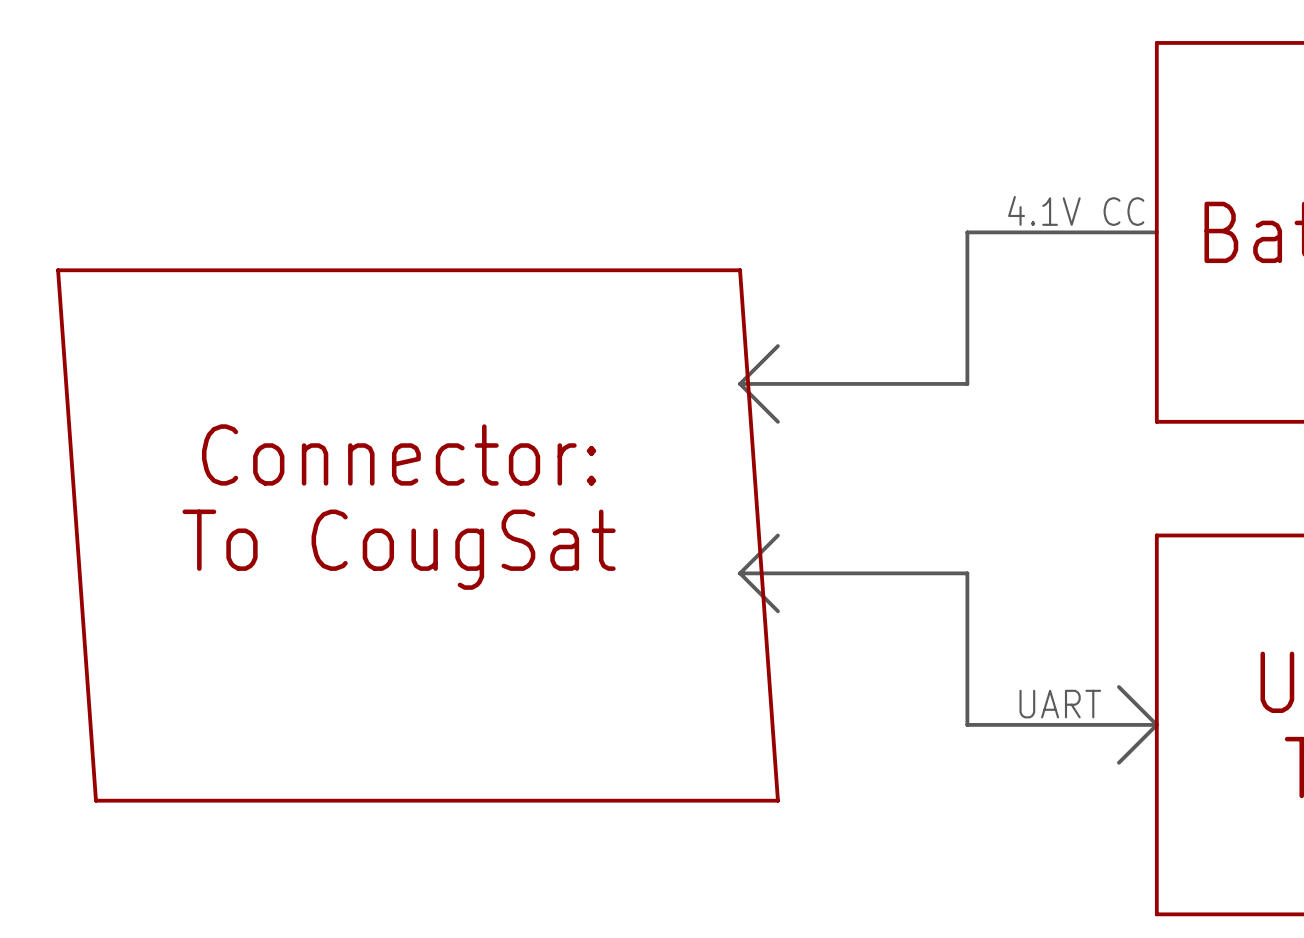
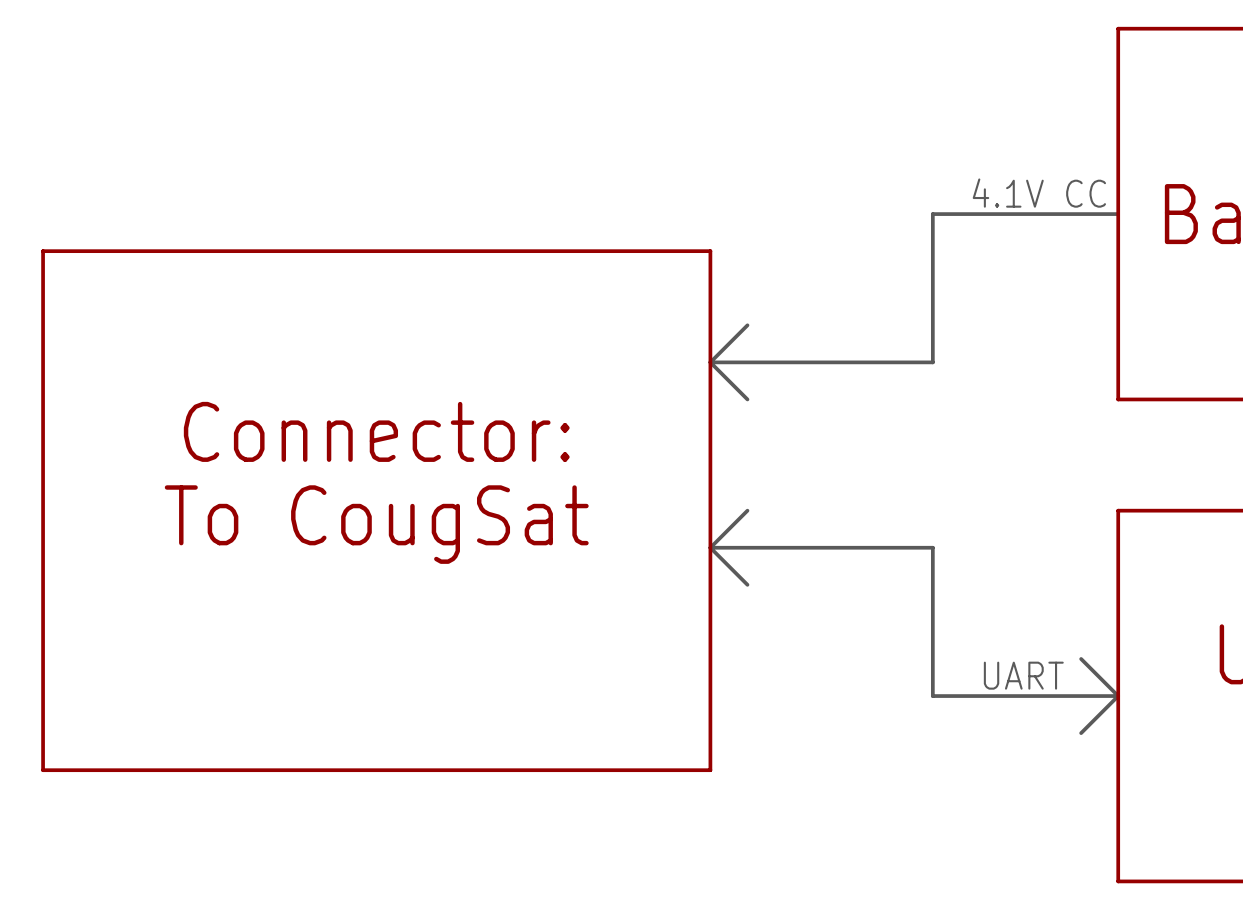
line: (58, 270) (95, 800) -> (43, 251) (43, 770) (80, 770)
line: (740, 270) (777, 800) (740, 800) -> (710, 251) (710, 770)

